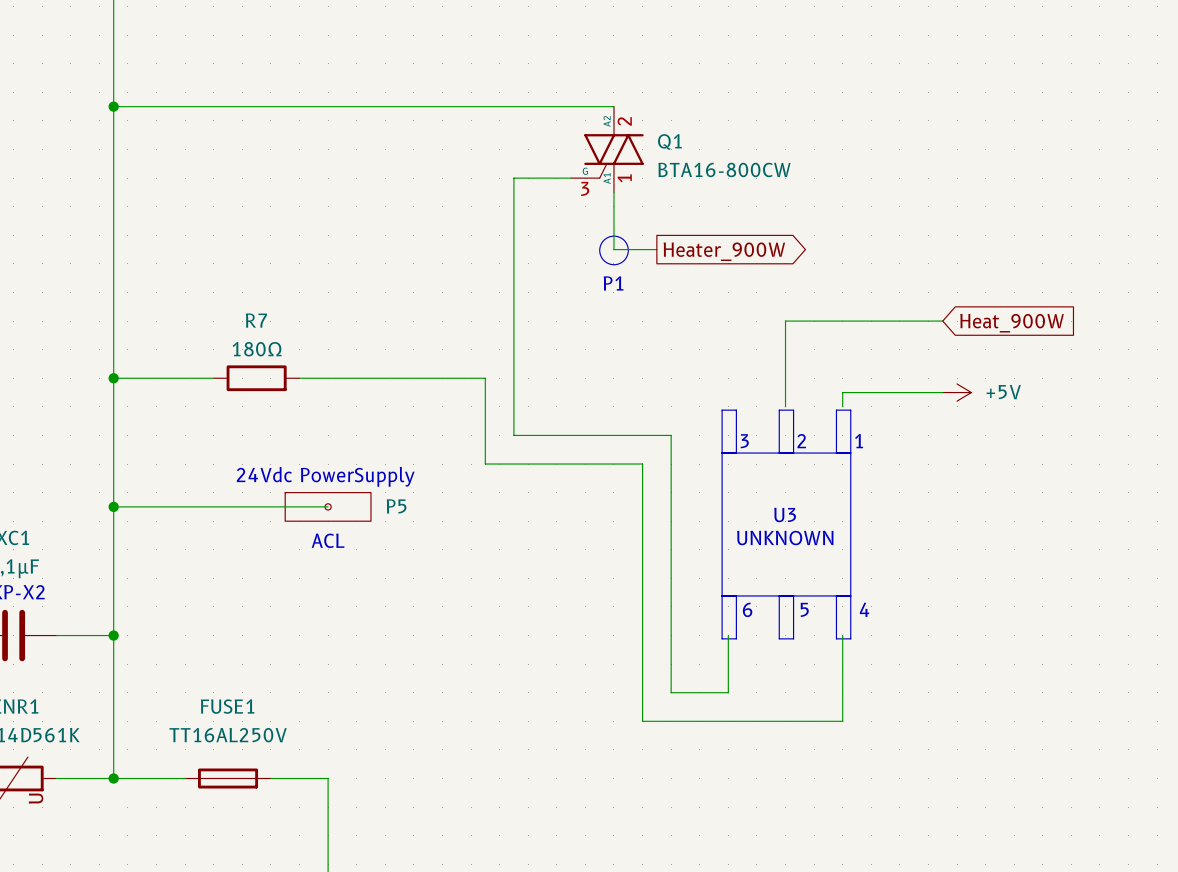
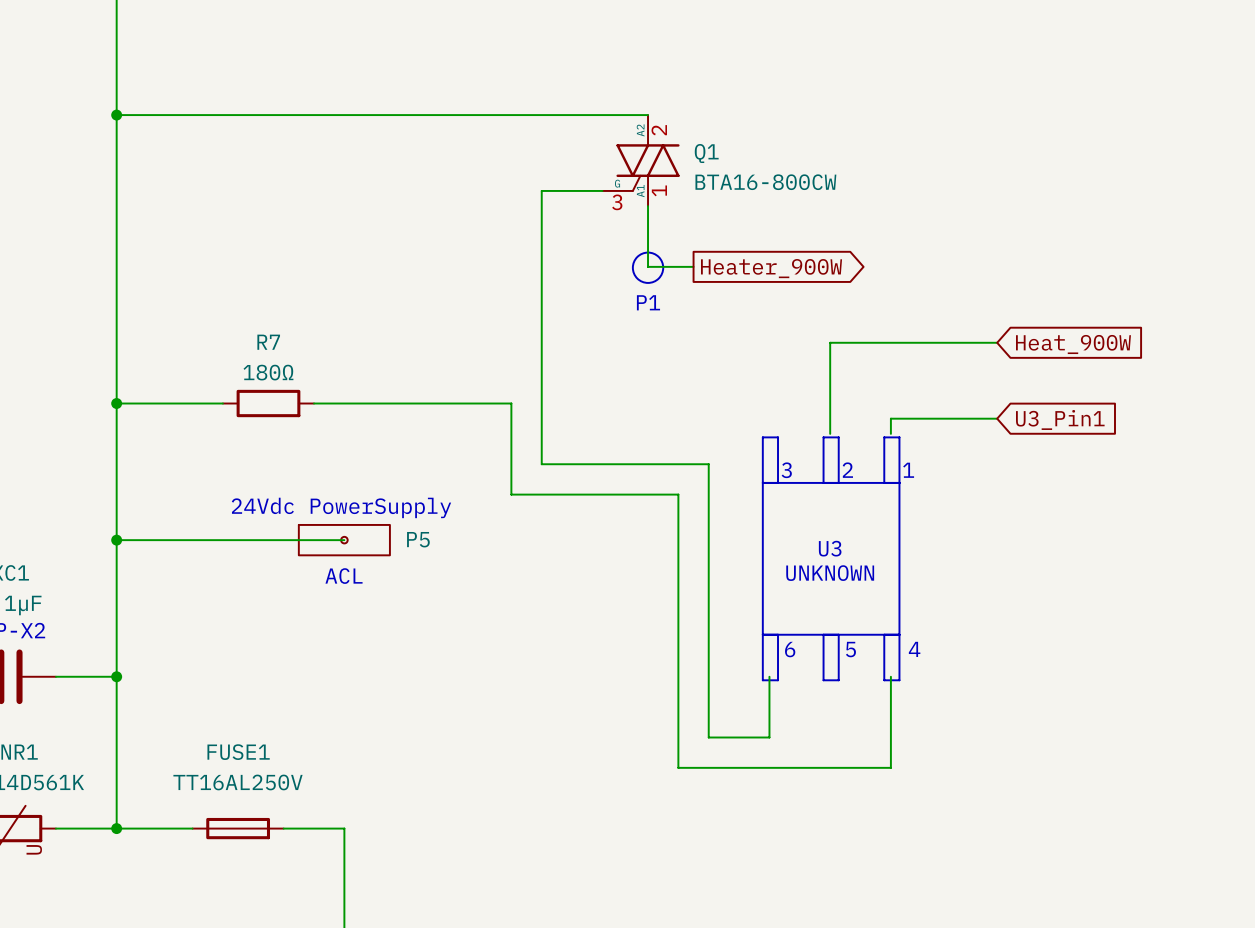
power symbol: +5V (957, 392) -> none
global label: none -> U3_Pin1 (1060, 419)

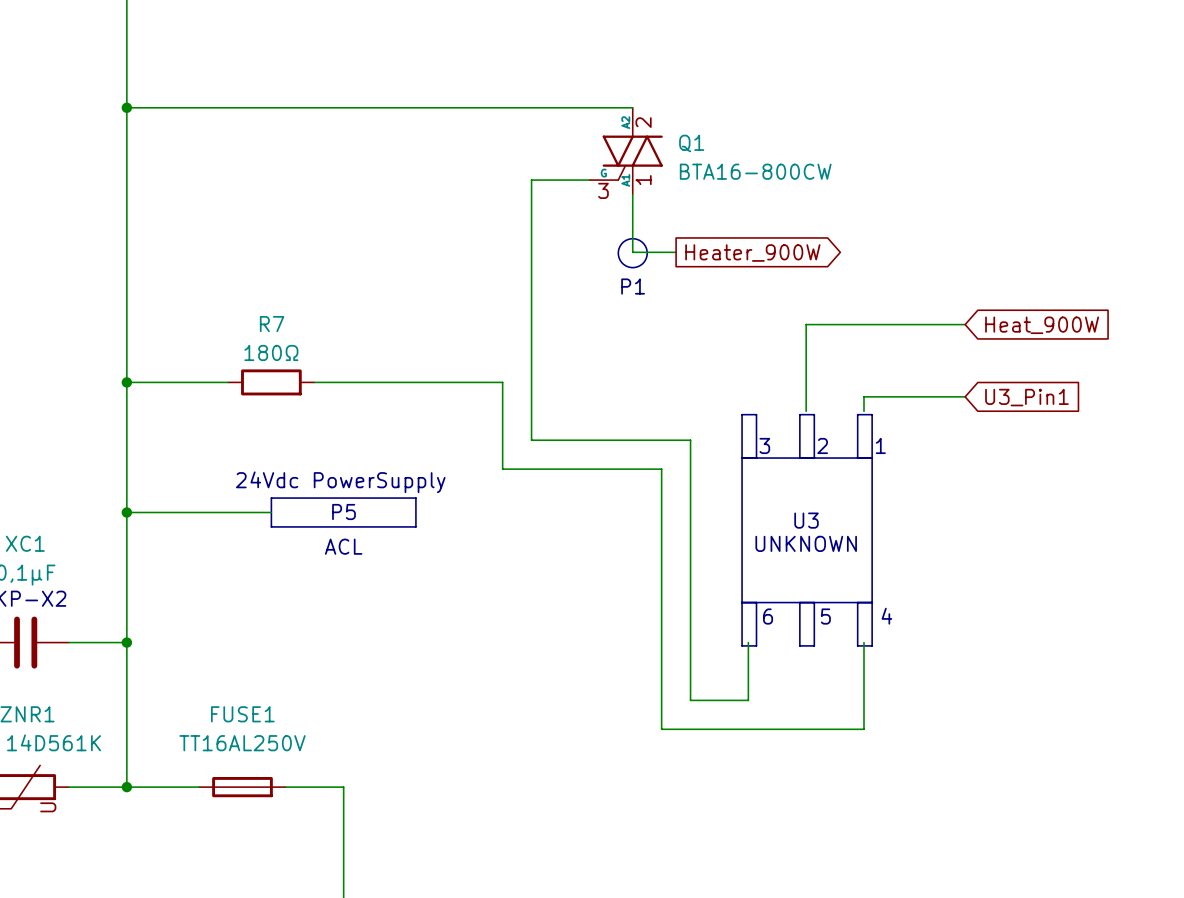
line: none -> (271, 498) (415, 498) (415, 526) (271, 526) (271, 498)
text: none -> P5 (344, 512)
wire: (268, 540) (344, 540) -> none
P5: (344, 540) -> none

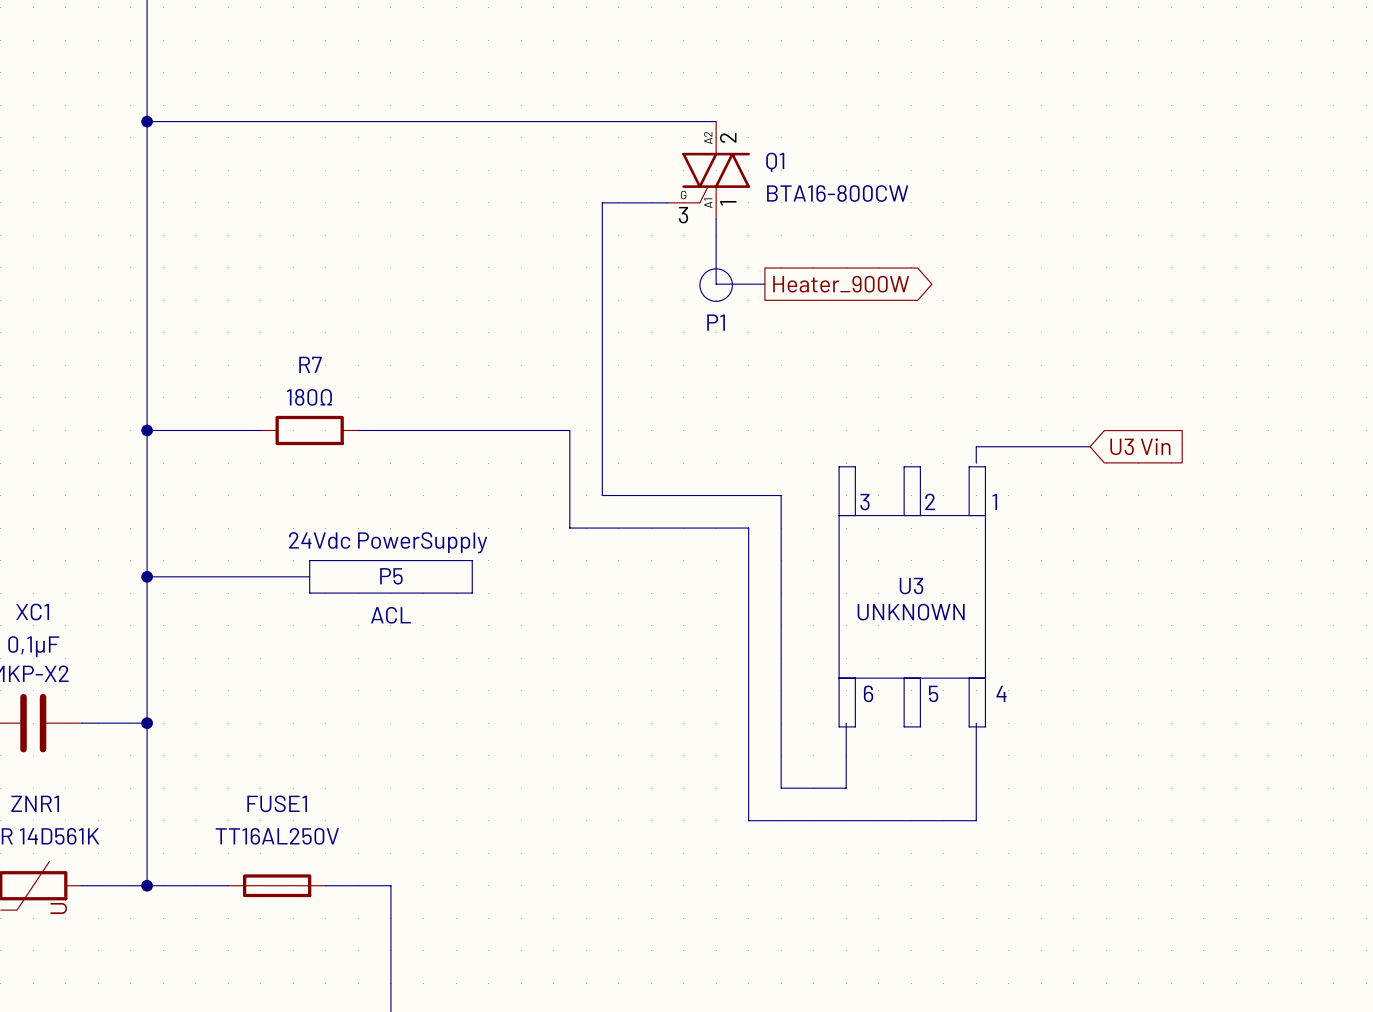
wire: (965, 324) (806, 324) (806, 411) -> none
global label: Heat_900W (1042, 325) -> none
global label: U3_Pin1 (1026, 397) -> U3 Vin (1140, 446)

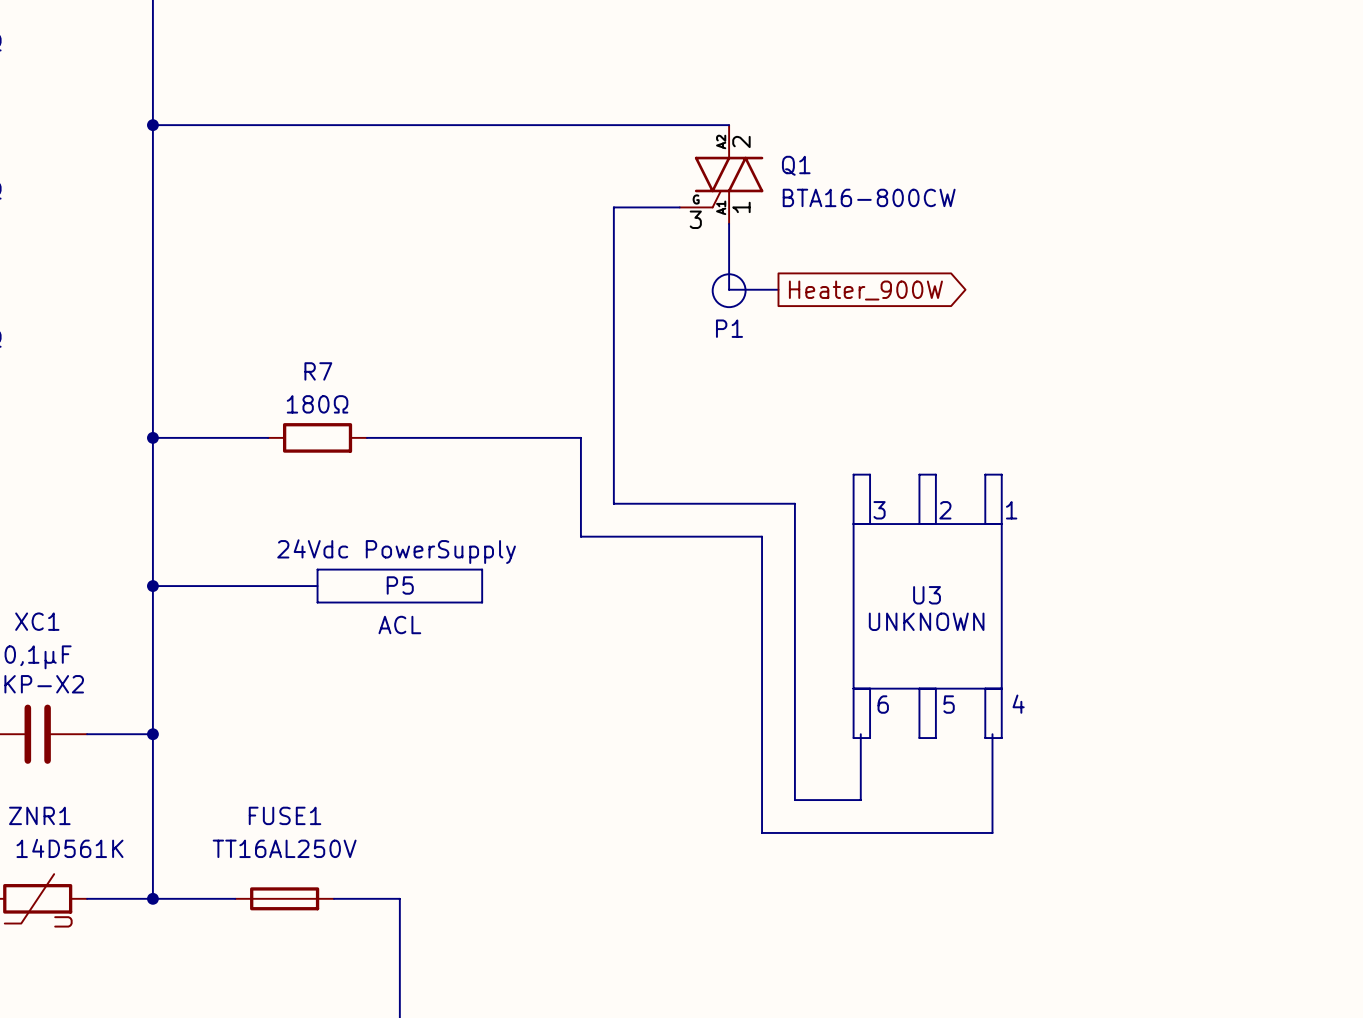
wire: (1090, 446) (976, 446) (976, 463) -> none
global label: U3 Vin (1140, 446) -> none

